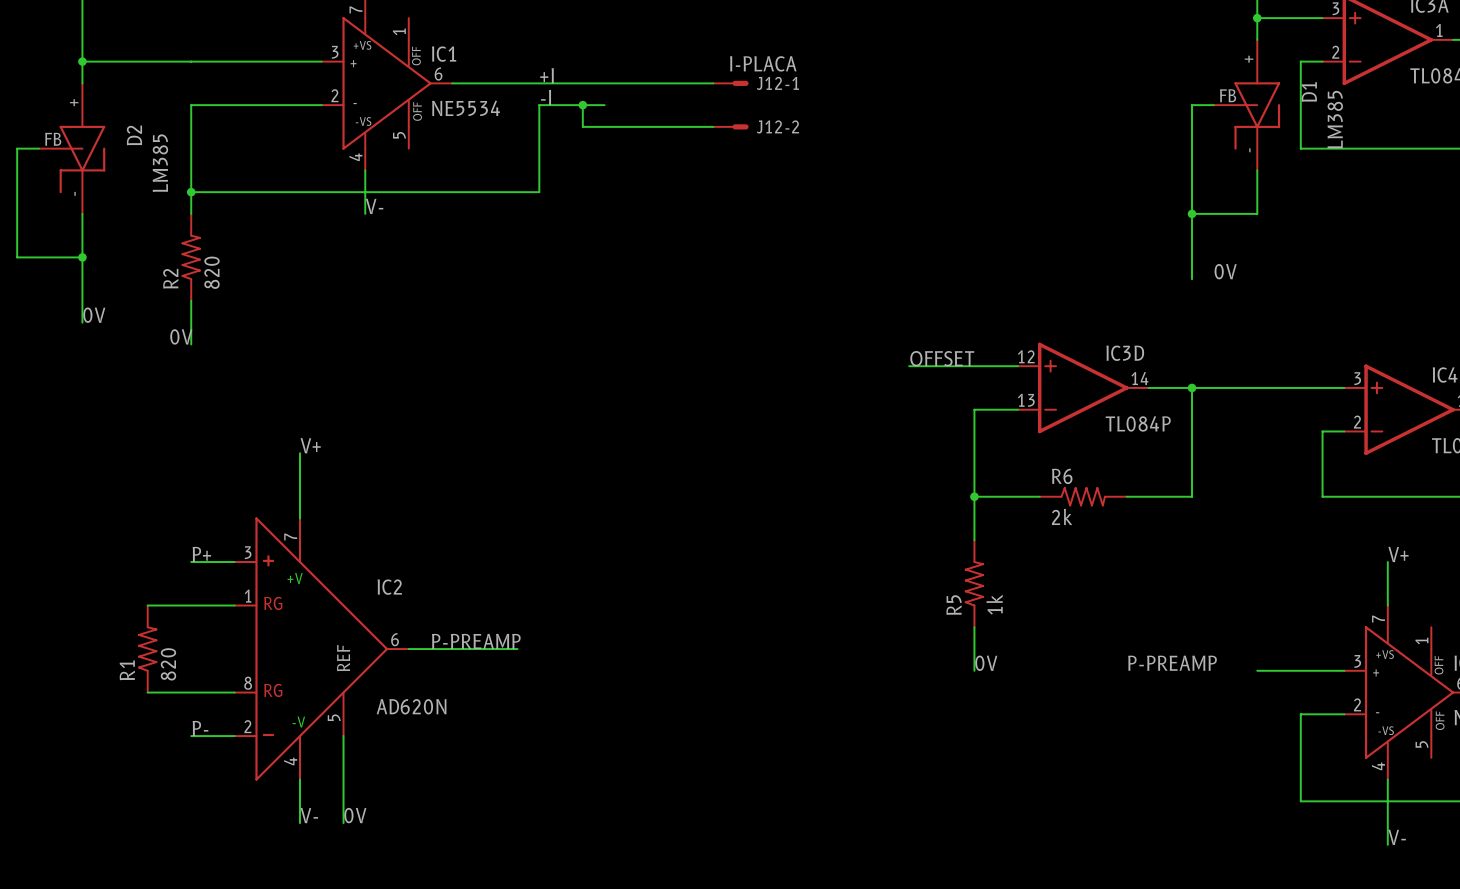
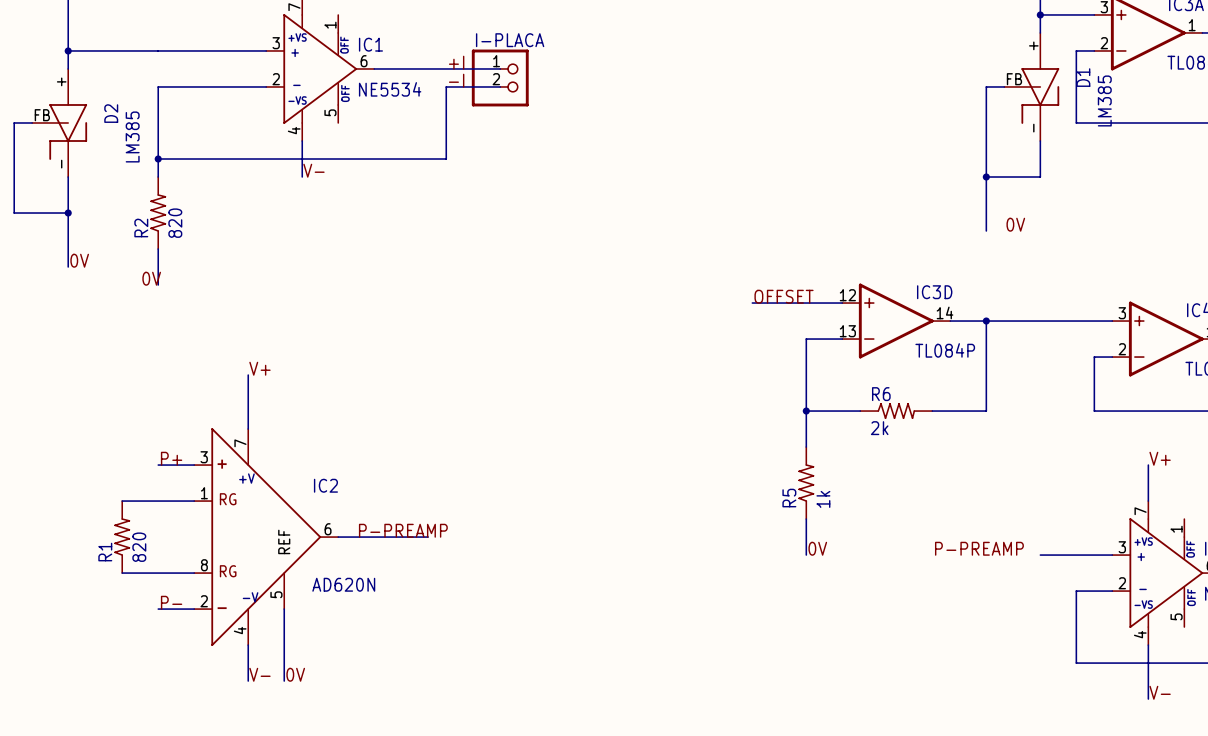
wire: (604, 83) (713, 83) -> none
J12-1: I-PLACA (730, 83) -> none
I-PLACA: none -> (500, 77)
wire: (582, 105) (582, 126) (713, 126) -> none
junction: (582, 105) -> none
J12-2: (730, 126) -> none

